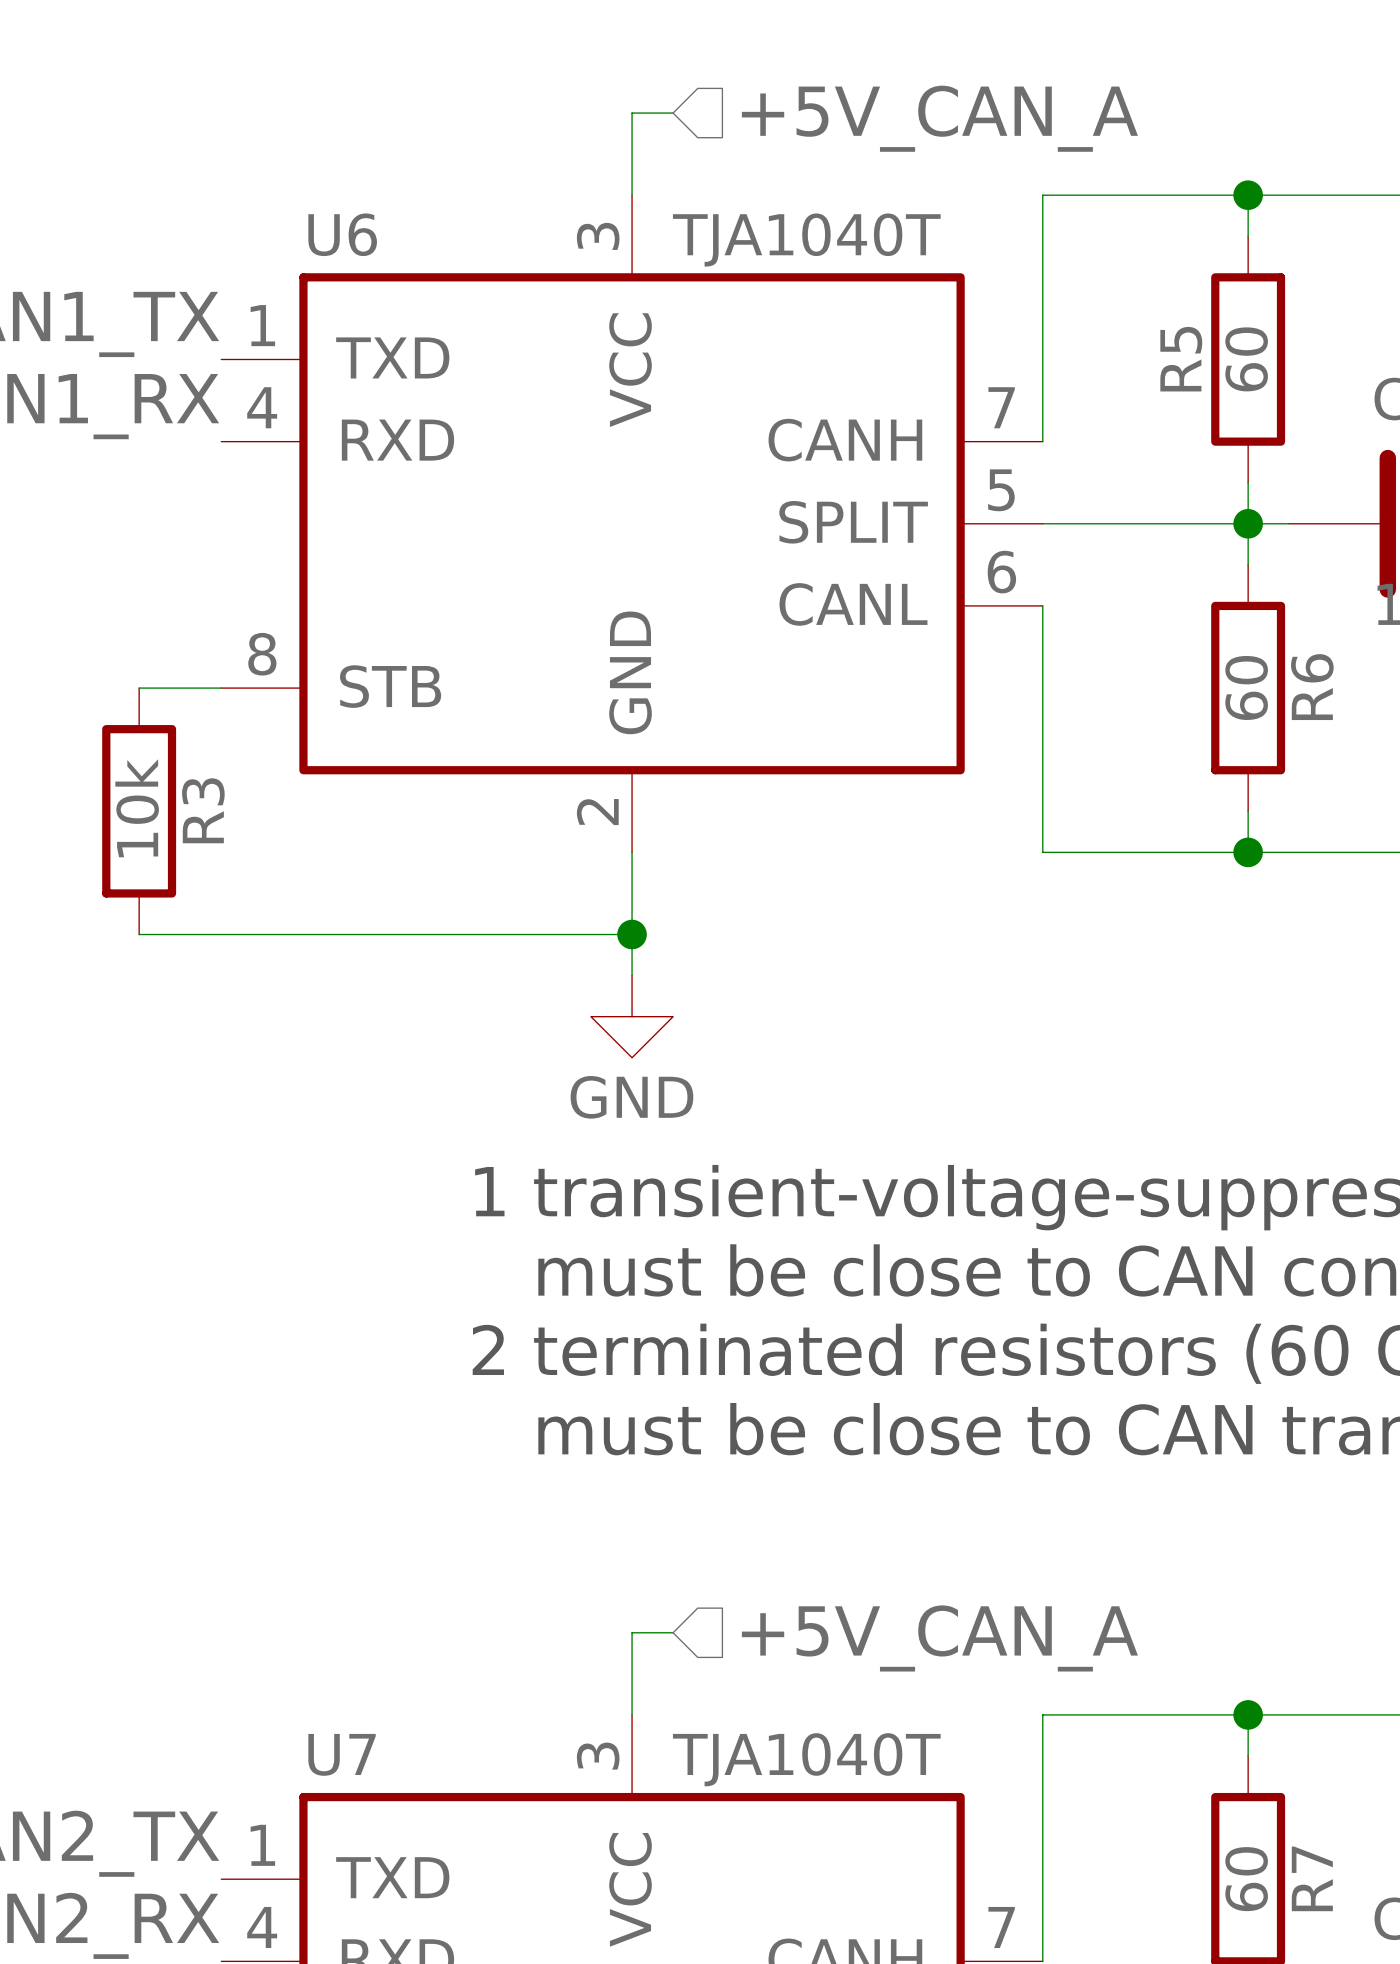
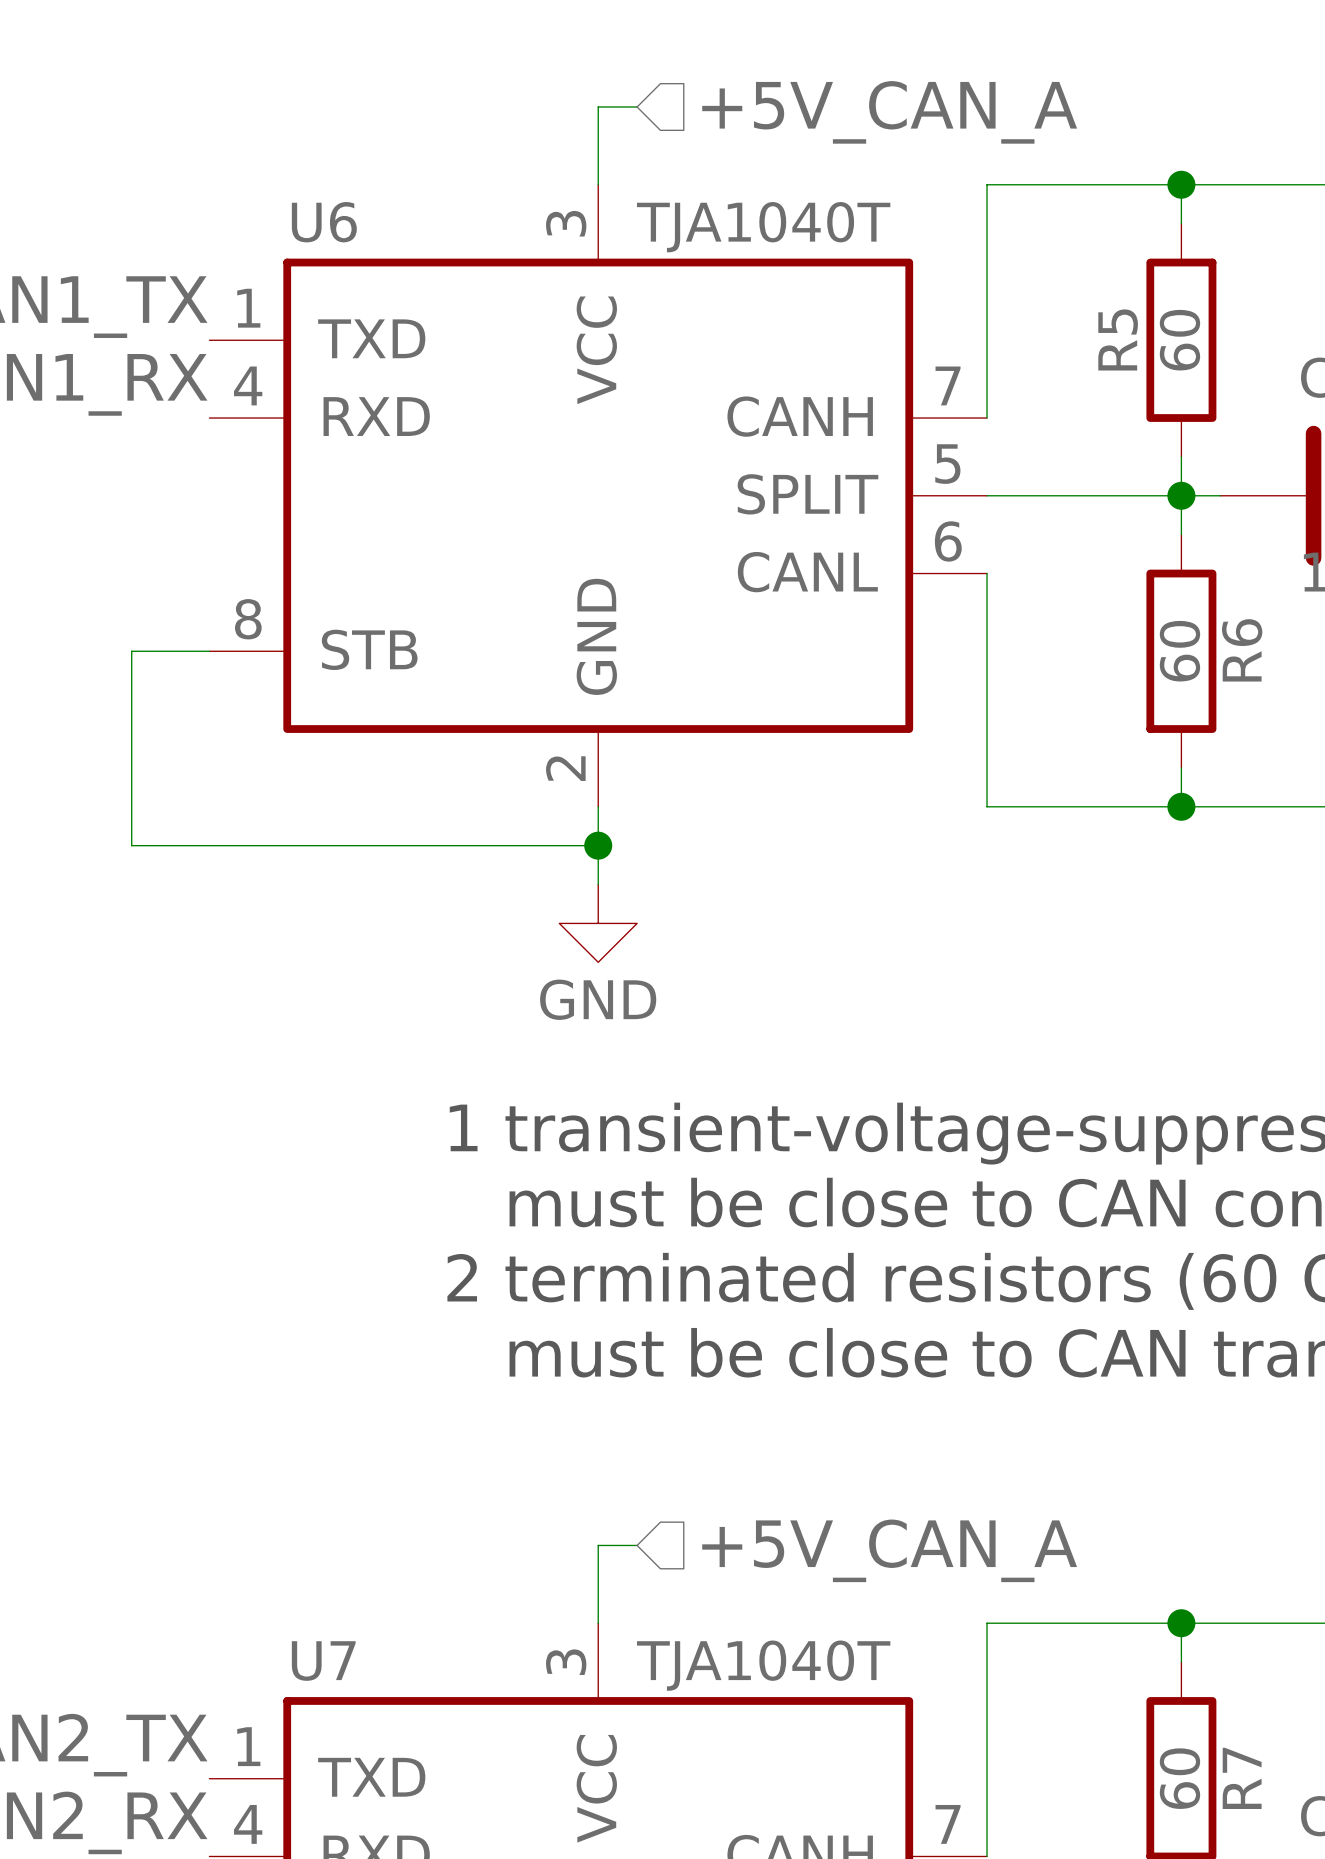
wire: none -> (131, 651) (131, 845) (598, 845)
R3: 10k (139, 811) -> none
wire: (139, 934) (632, 934) (632, 975) -> none
junction position: (632, 934) -> (598, 845)
power symbol position: GND (632, 1016) -> GND (598, 923)

